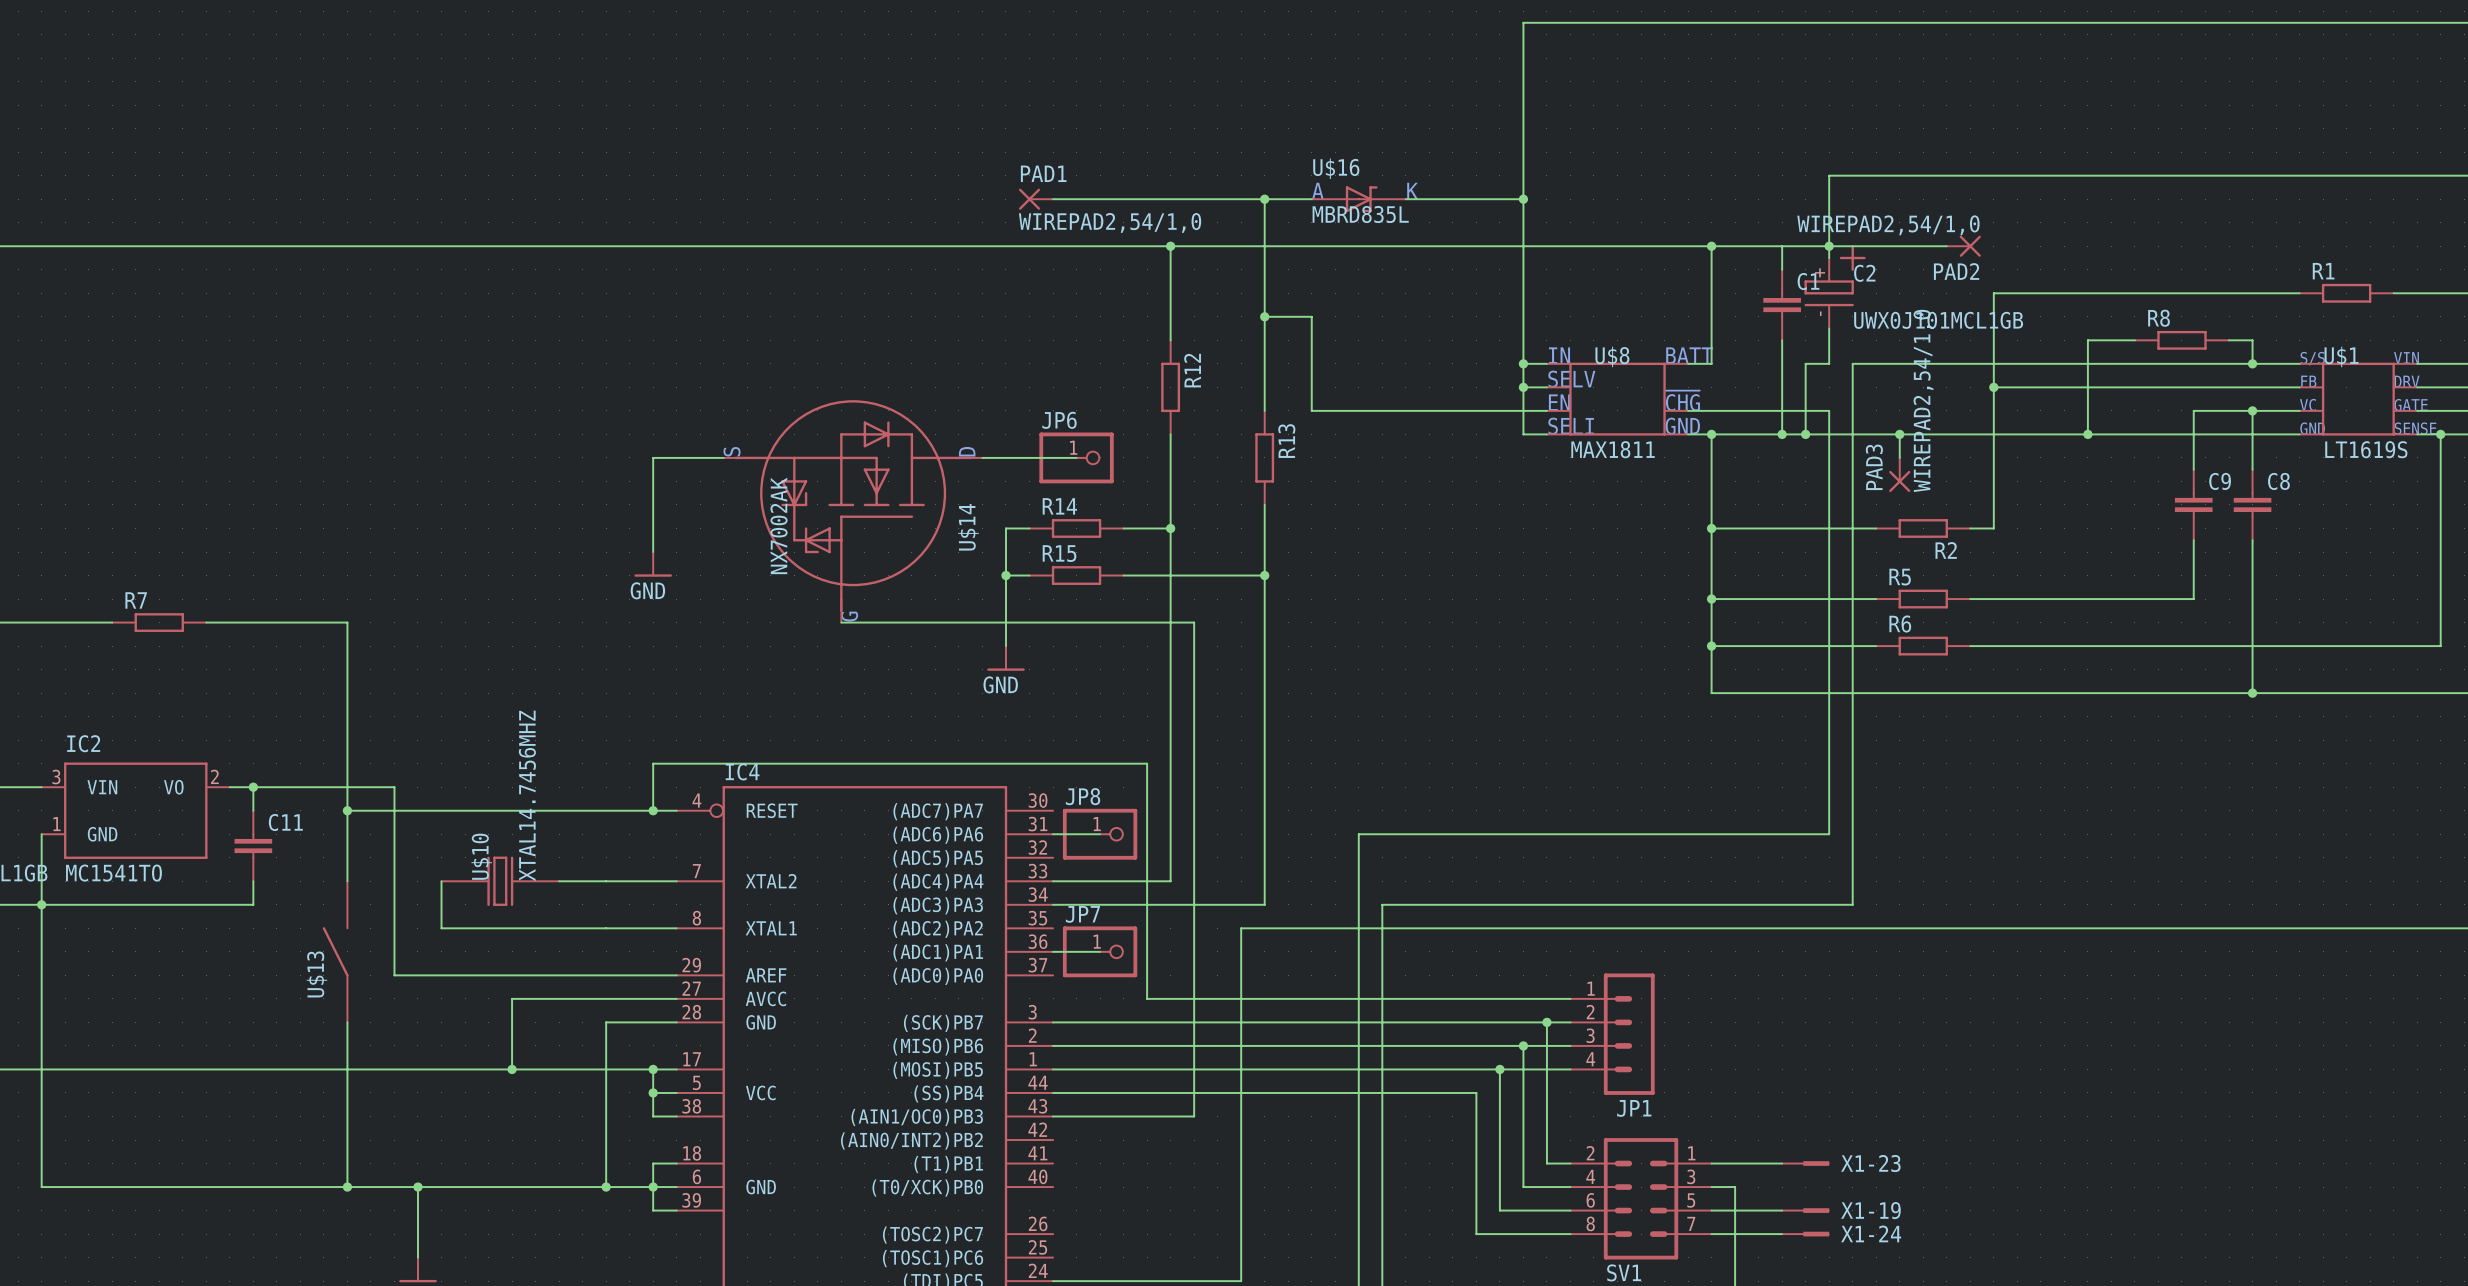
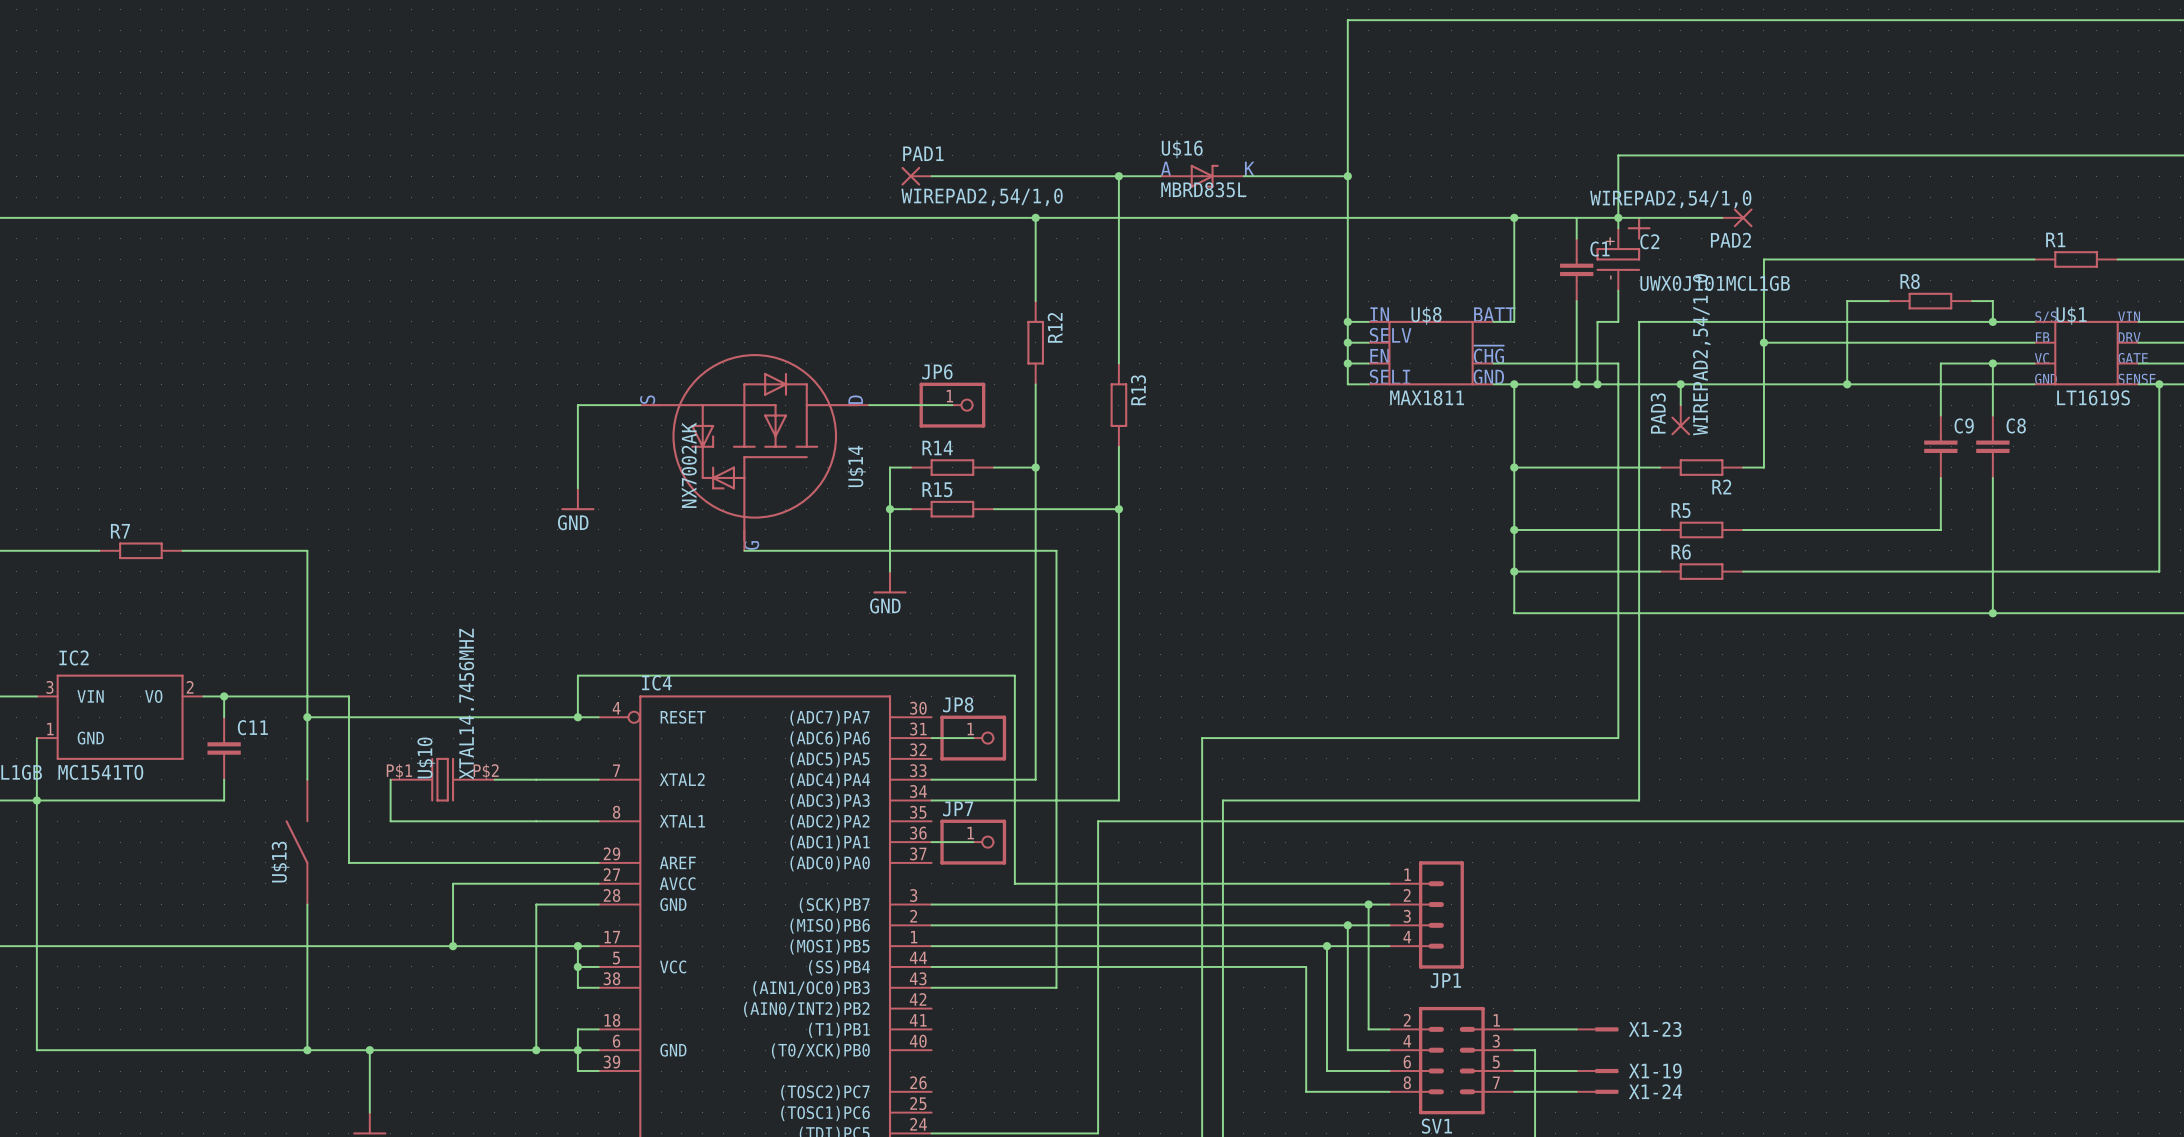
wire: (1264, 316) (1311, 316) (1311, 410) (1523, 410) -> none
junction: (1264, 316) -> none
junction: none -> (1347, 363)
U$10 pin number: none -> P$1 (399, 771)
U$10 pin number: none -> P$2 (486, 771)

